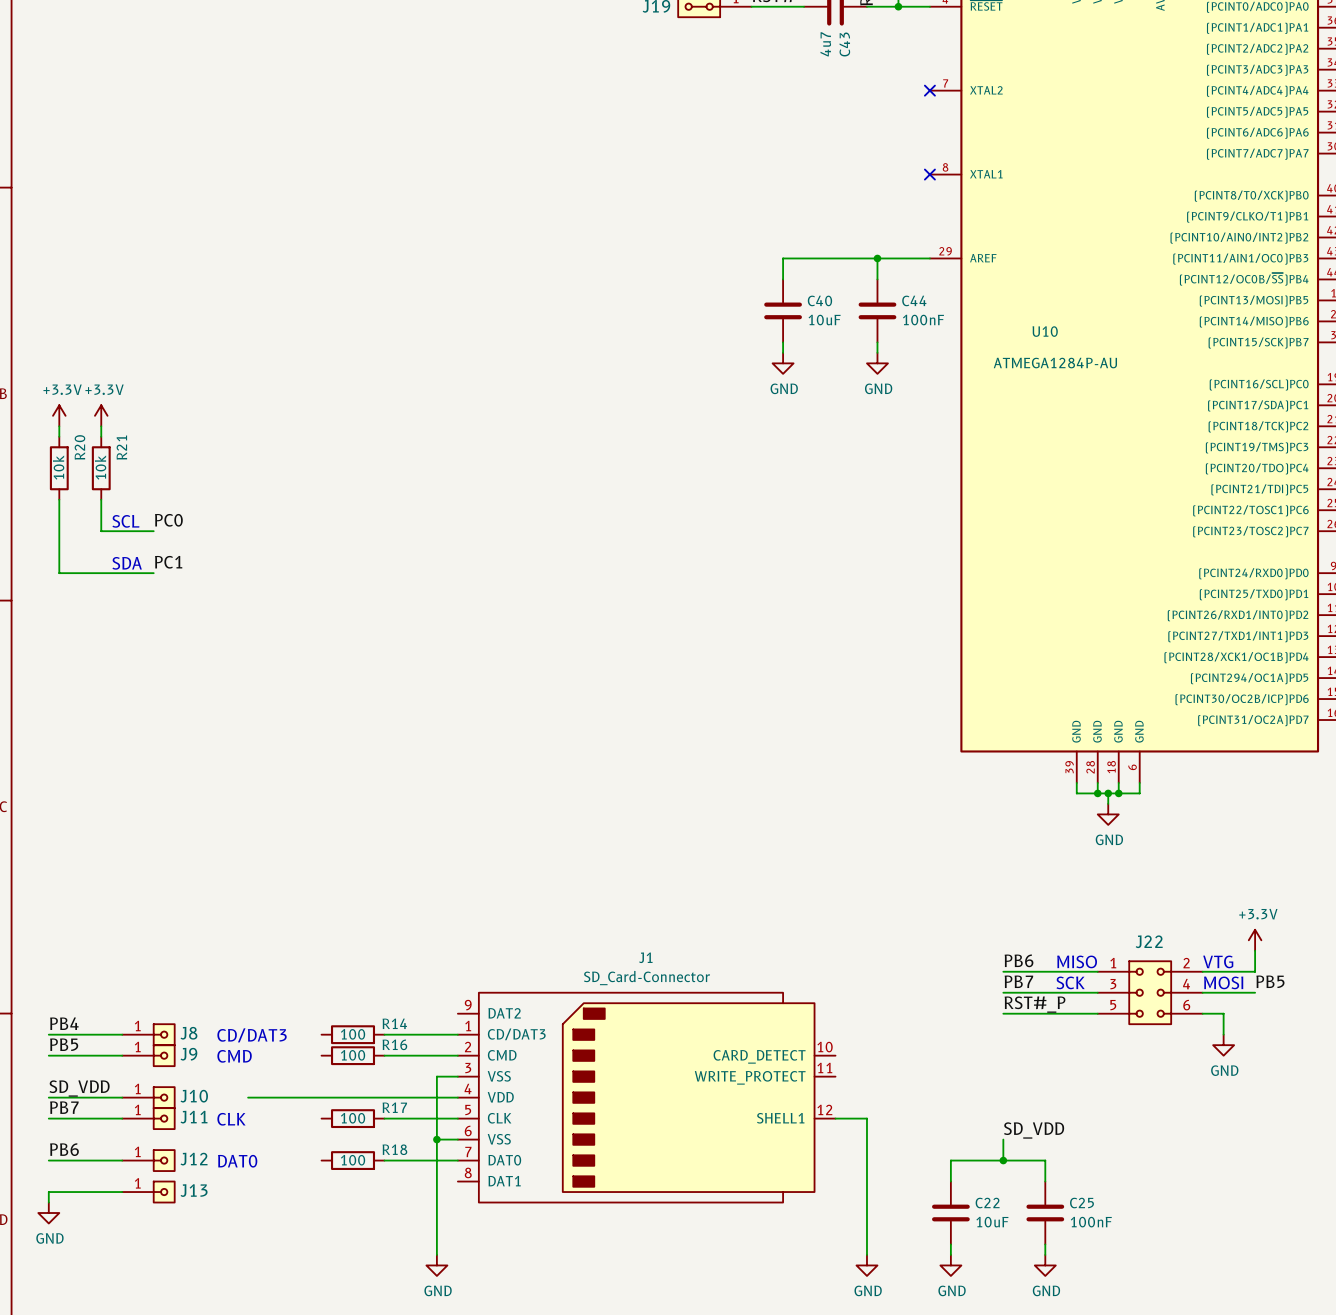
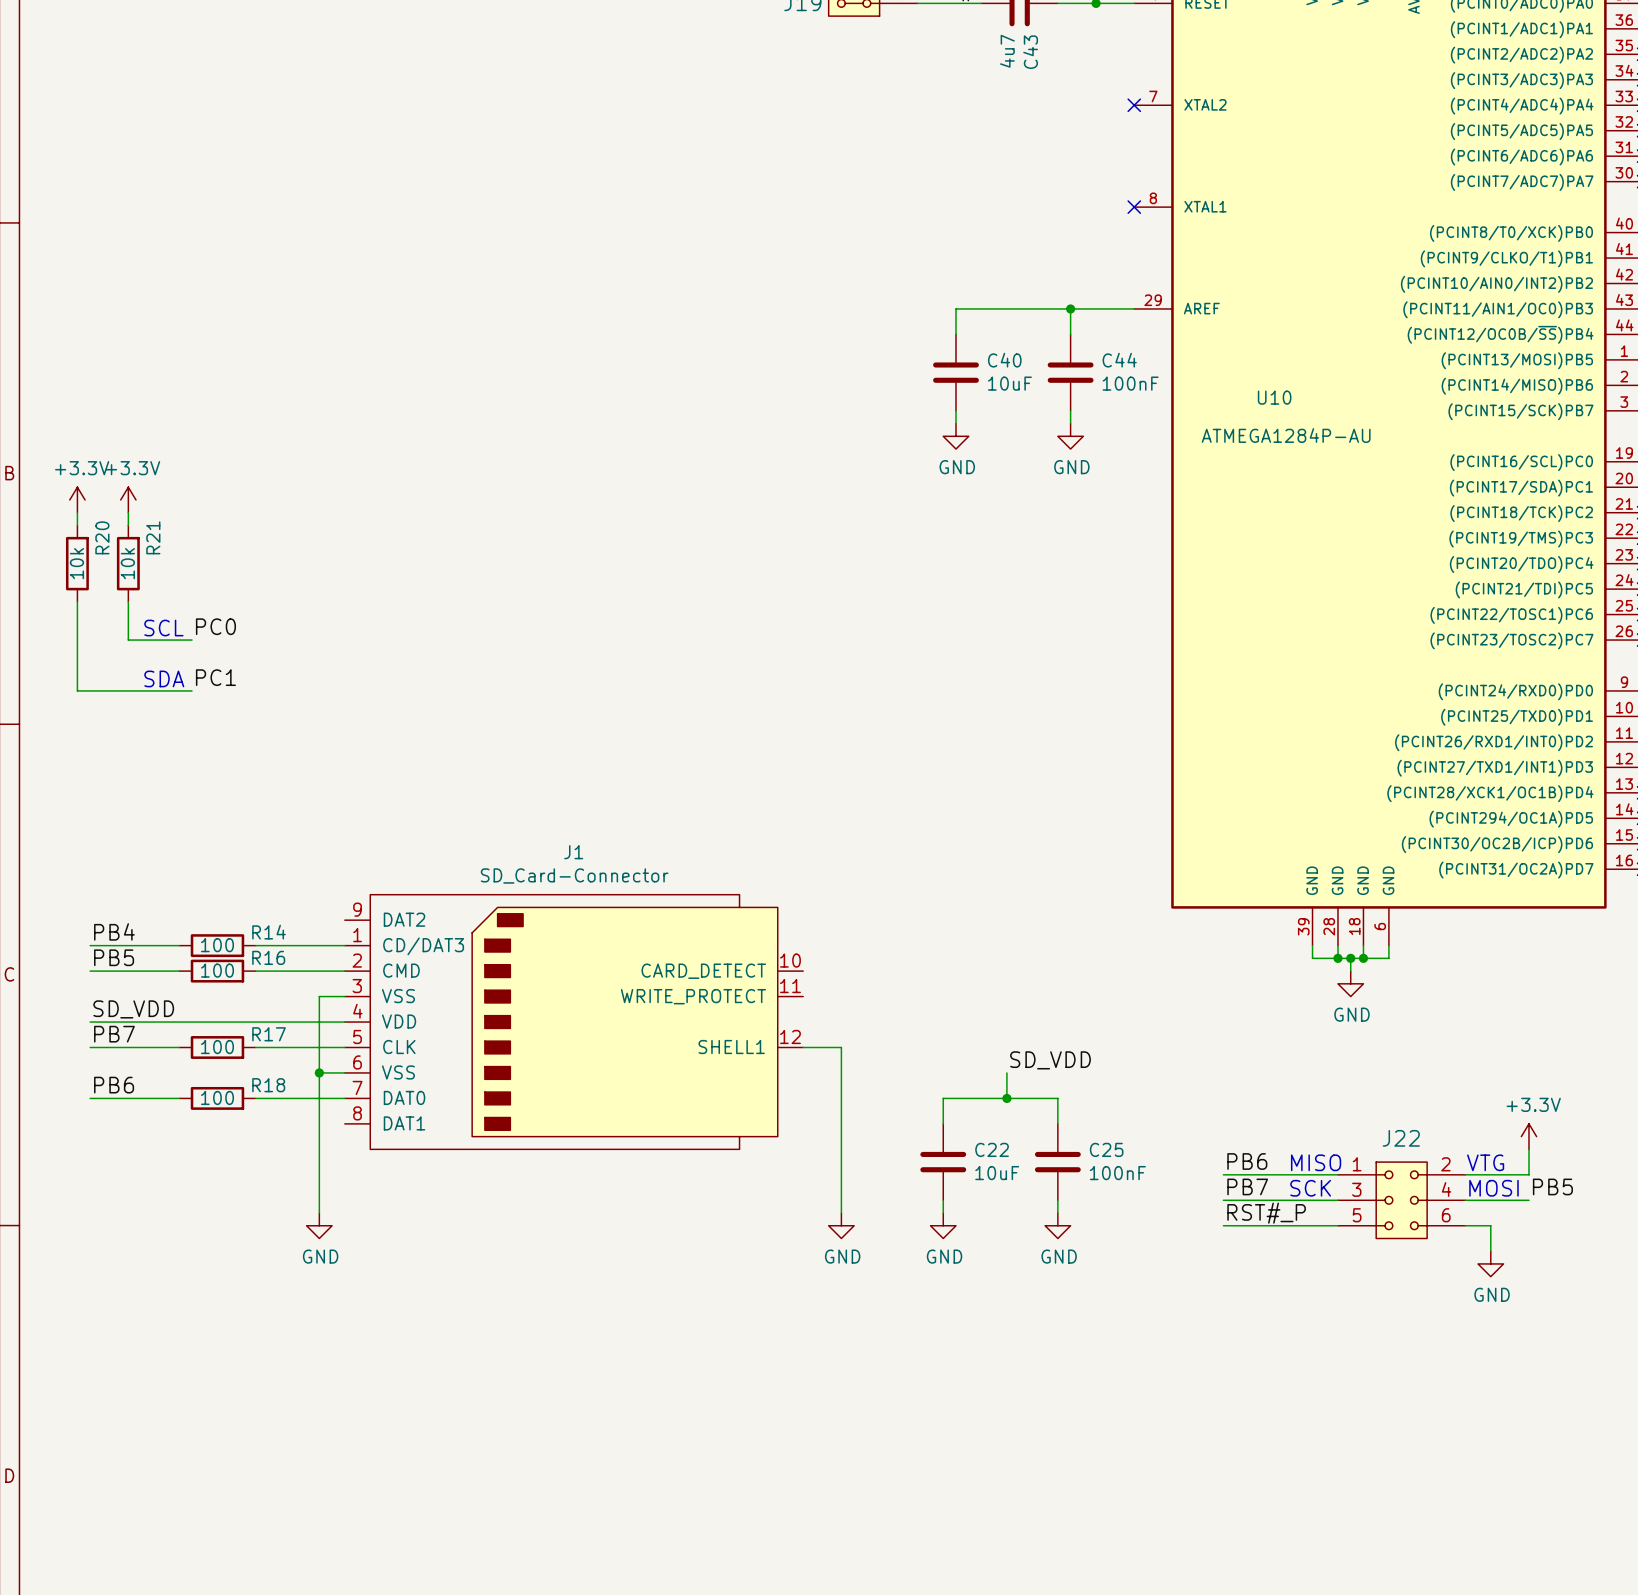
label: none -> PB4 (114, 931)
wire: none -> (90, 945) (179, 945)
wire: none -> (255, 945) (344, 945)
label: none -> PB5 (114, 957)
wire: none -> (90, 971) (179, 971)
wire: none -> (255, 971) (344, 971)
wire: none -> (344, 996) (319, 996) (319, 1213)
label: none -> SD_VDD (133, 1009)
wire: none -> (90, 1022) (344, 1022)
label: none -> PB7 (114, 1034)
wire: none -> (255, 1047) (344, 1047)
wire: none -> (803, 1047) (841, 1047) (841, 1213)
label: none -> SD_VDD (1050, 1060)
wire: none -> (319, 1072) (344, 1072)
junction: none -> (319, 1072)
wire: none -> (1006, 1072) (1006, 1098)
label: none -> PB6 (114, 1085)
junction: none -> (1006, 1098)
wire: none -> (943, 1123) (943, 1098) (1057, 1098) (1057, 1123)
wire: none -> (943, 1200) (943, 1213)
wire: none -> (1057, 1200) (1057, 1213)
power symbol: none -> GND (319, 1225)
power symbol: none -> GND (841, 1225)
power symbol: none -> GND (943, 1225)
power symbol: none -> GND (1057, 1225)
label: PB4 (64, 1023) -> none
wire: (48, 1034) (122, 1034) -> (255, 1098) (344, 1098)
J8: (148, 1034) -> none
R14 position: (353, 1034) -> (217, 945)
wire: (384, 1034) (457, 1034) -> none
text: CD/DAT3 (252, 1035) -> none
label: PB5 (64, 1044) -> none
wire: (48, 1055) (122, 1055) -> (90, 1047) (179, 1047)
J9: (148, 1055) -> none
R16 position: (353, 1055) -> (217, 971)
wire: (384, 1055) (457, 1055) -> none
text: CMD (234, 1056) -> none
wire: (457, 1076) (436, 1076) (436, 1254) -> none
label: SD_VDD (79, 1088) -> none
wire: (48, 1097) (122, 1097) -> (90, 1098) (179, 1098)
J10: (148, 1097) -> none
wire: (248, 1097) (457, 1097) -> none
J1 position: (646, 1097) -> (574, 1022)
label: PB7 (64, 1107) -> none
wire: (48, 1118) (122, 1118) -> none
J11: (148, 1118) -> none
R17 position: (353, 1118) -> (217, 1047)
wire: (384, 1118) (457, 1118) -> none
wire: (835, 1118) (866, 1118) (866, 1254) -> none
text: CLK (231, 1119) -> none
label: SD_VDD (1034, 1130) -> none
wire: (436, 1139) (457, 1139) -> none
junction: (436, 1139) -> none
wire: (1003, 1139) (1003, 1160) -> none
label: PB6 (64, 1149) -> none
wire: (48, 1160) (122, 1160) -> none
J12: (148, 1160) -> none
R18 position: (353, 1160) -> (217, 1098)
wire: (384, 1160) (457, 1160) -> none
junction: (1003, 1160) -> none
text: DAT0 (237, 1161) -> none
wire: (950, 1181) (950, 1160) (1045, 1160) (1045, 1181) -> none
wire: (122, 1192) (48, 1192) (48, 1202) -> none
J13: (148, 1192) -> none
power symbol: GND (48, 1213) -> none
C22 position: (950, 1213) -> (943, 1162)
C25 position: (1045, 1213) -> (1057, 1162)
wire: (950, 1244) (950, 1254) -> none
wire: (1045, 1244) (1045, 1254) -> none
power symbol: GND (436, 1265) -> none
power symbol: GND (866, 1265) -> none
power symbol: GND (950, 1265) -> none
power symbol: GND (1045, 1265) -> none

